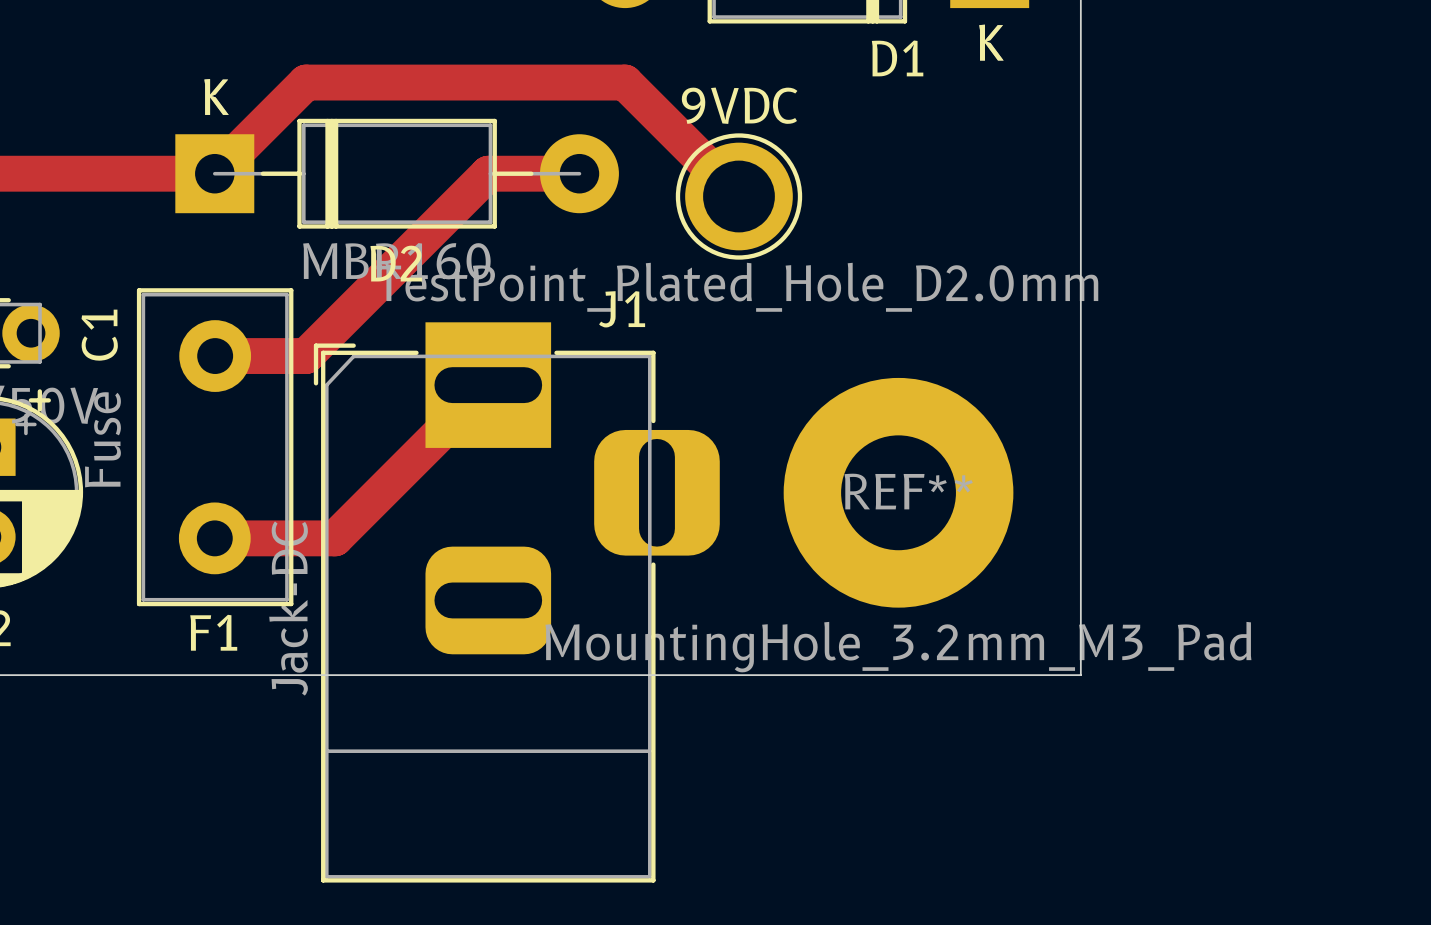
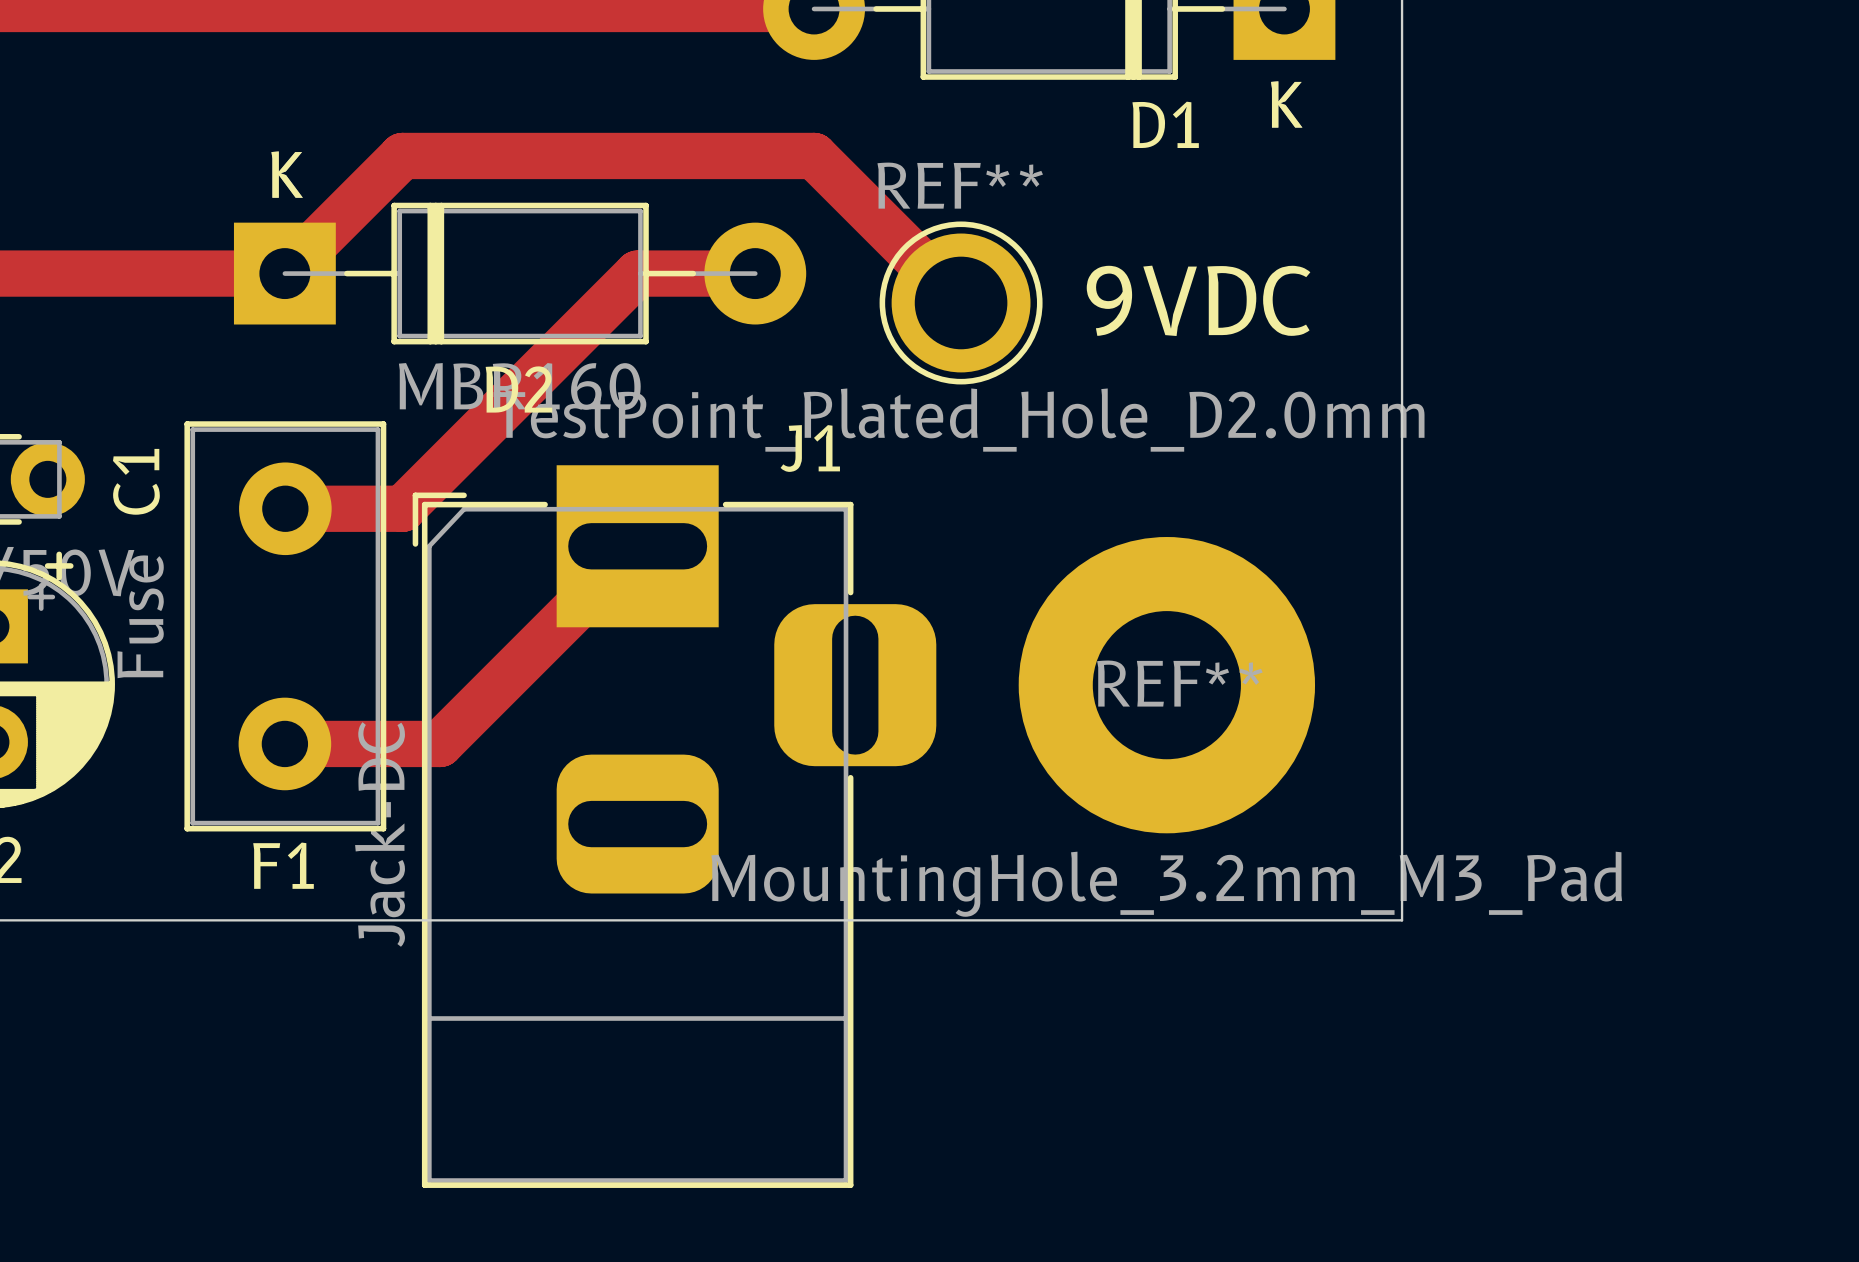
9VDC name: 9VDC (739, 105) -> REF** (960, 185)
text: none -> 9VDC (1198, 300)

